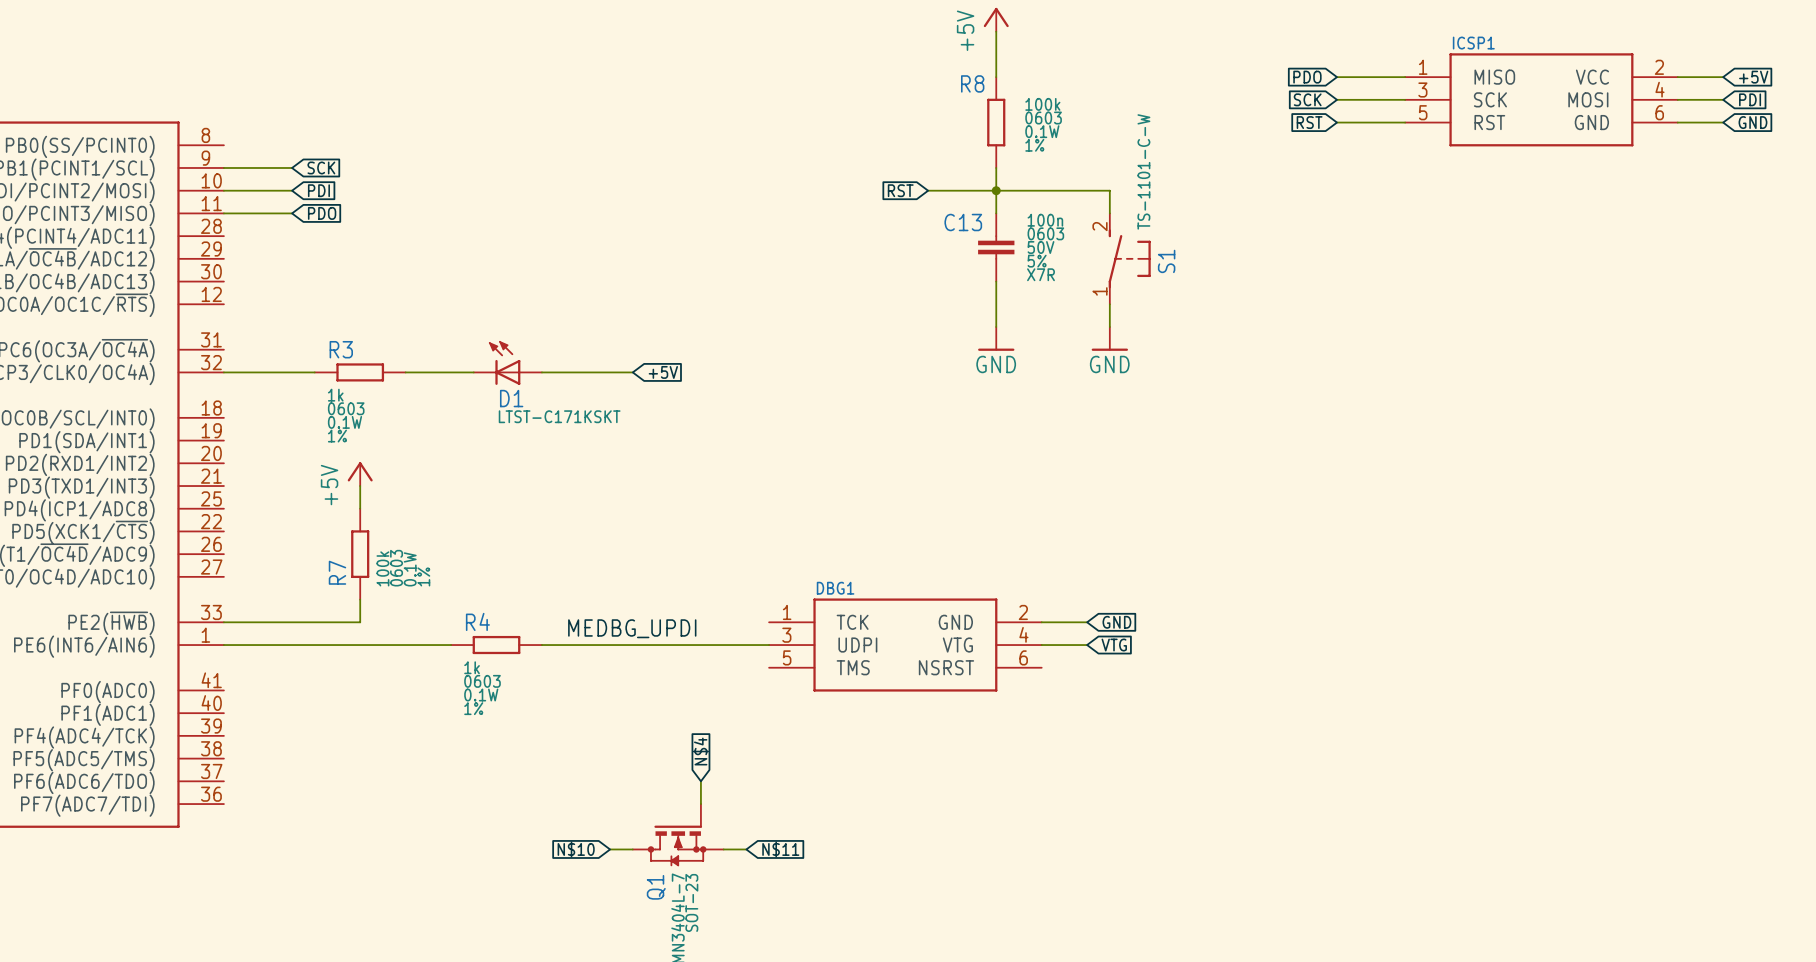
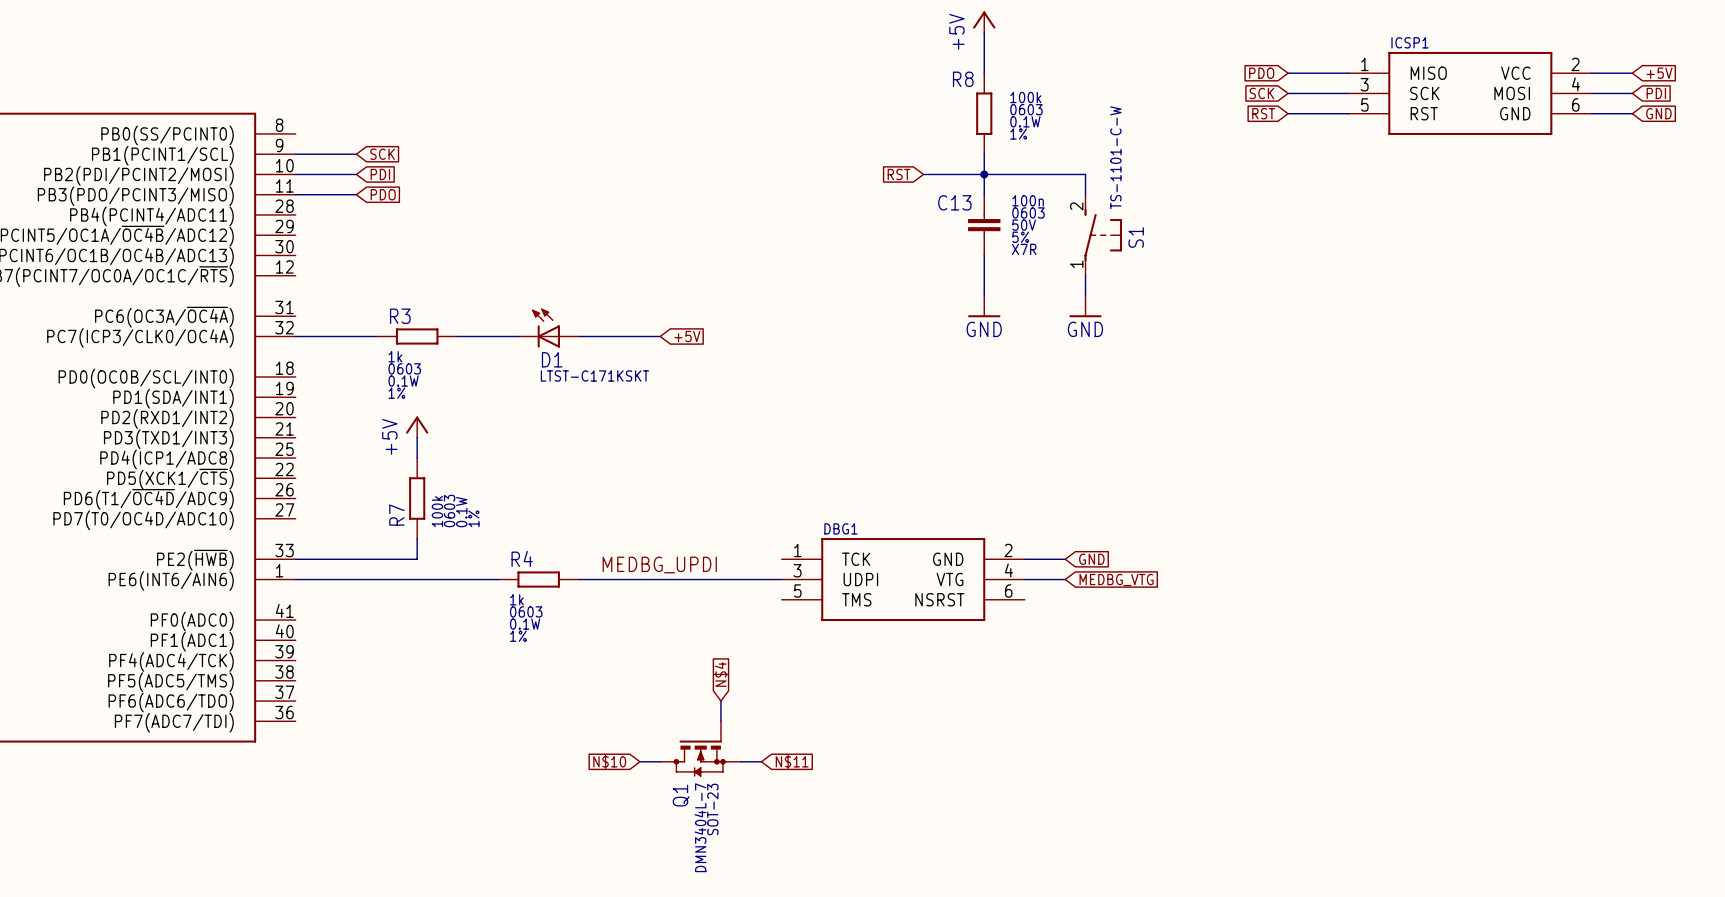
global label: VTG (1114, 645) -> MEDBG_VTG (1116, 580)

